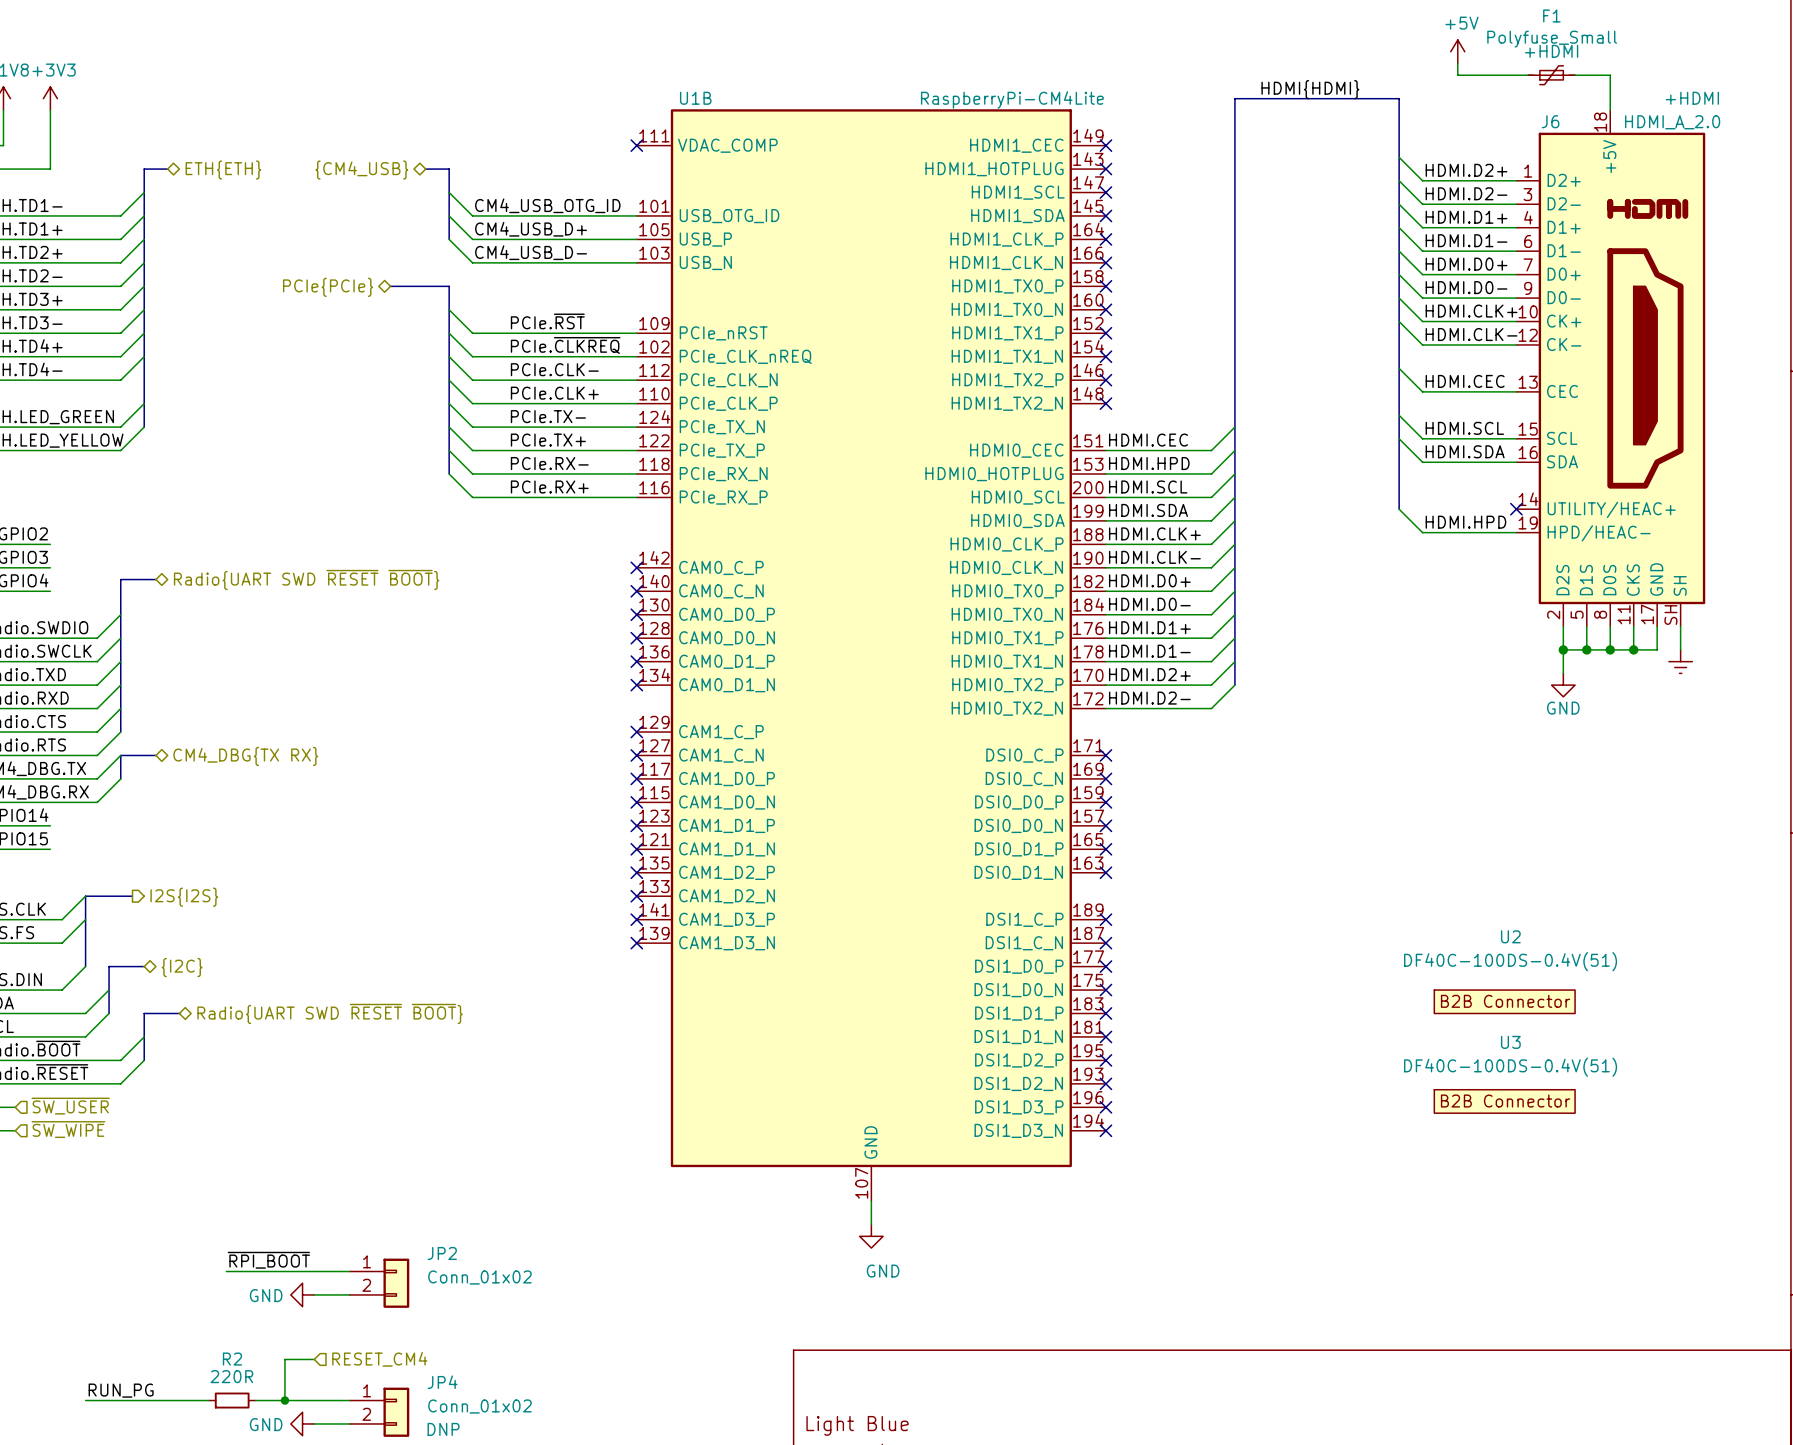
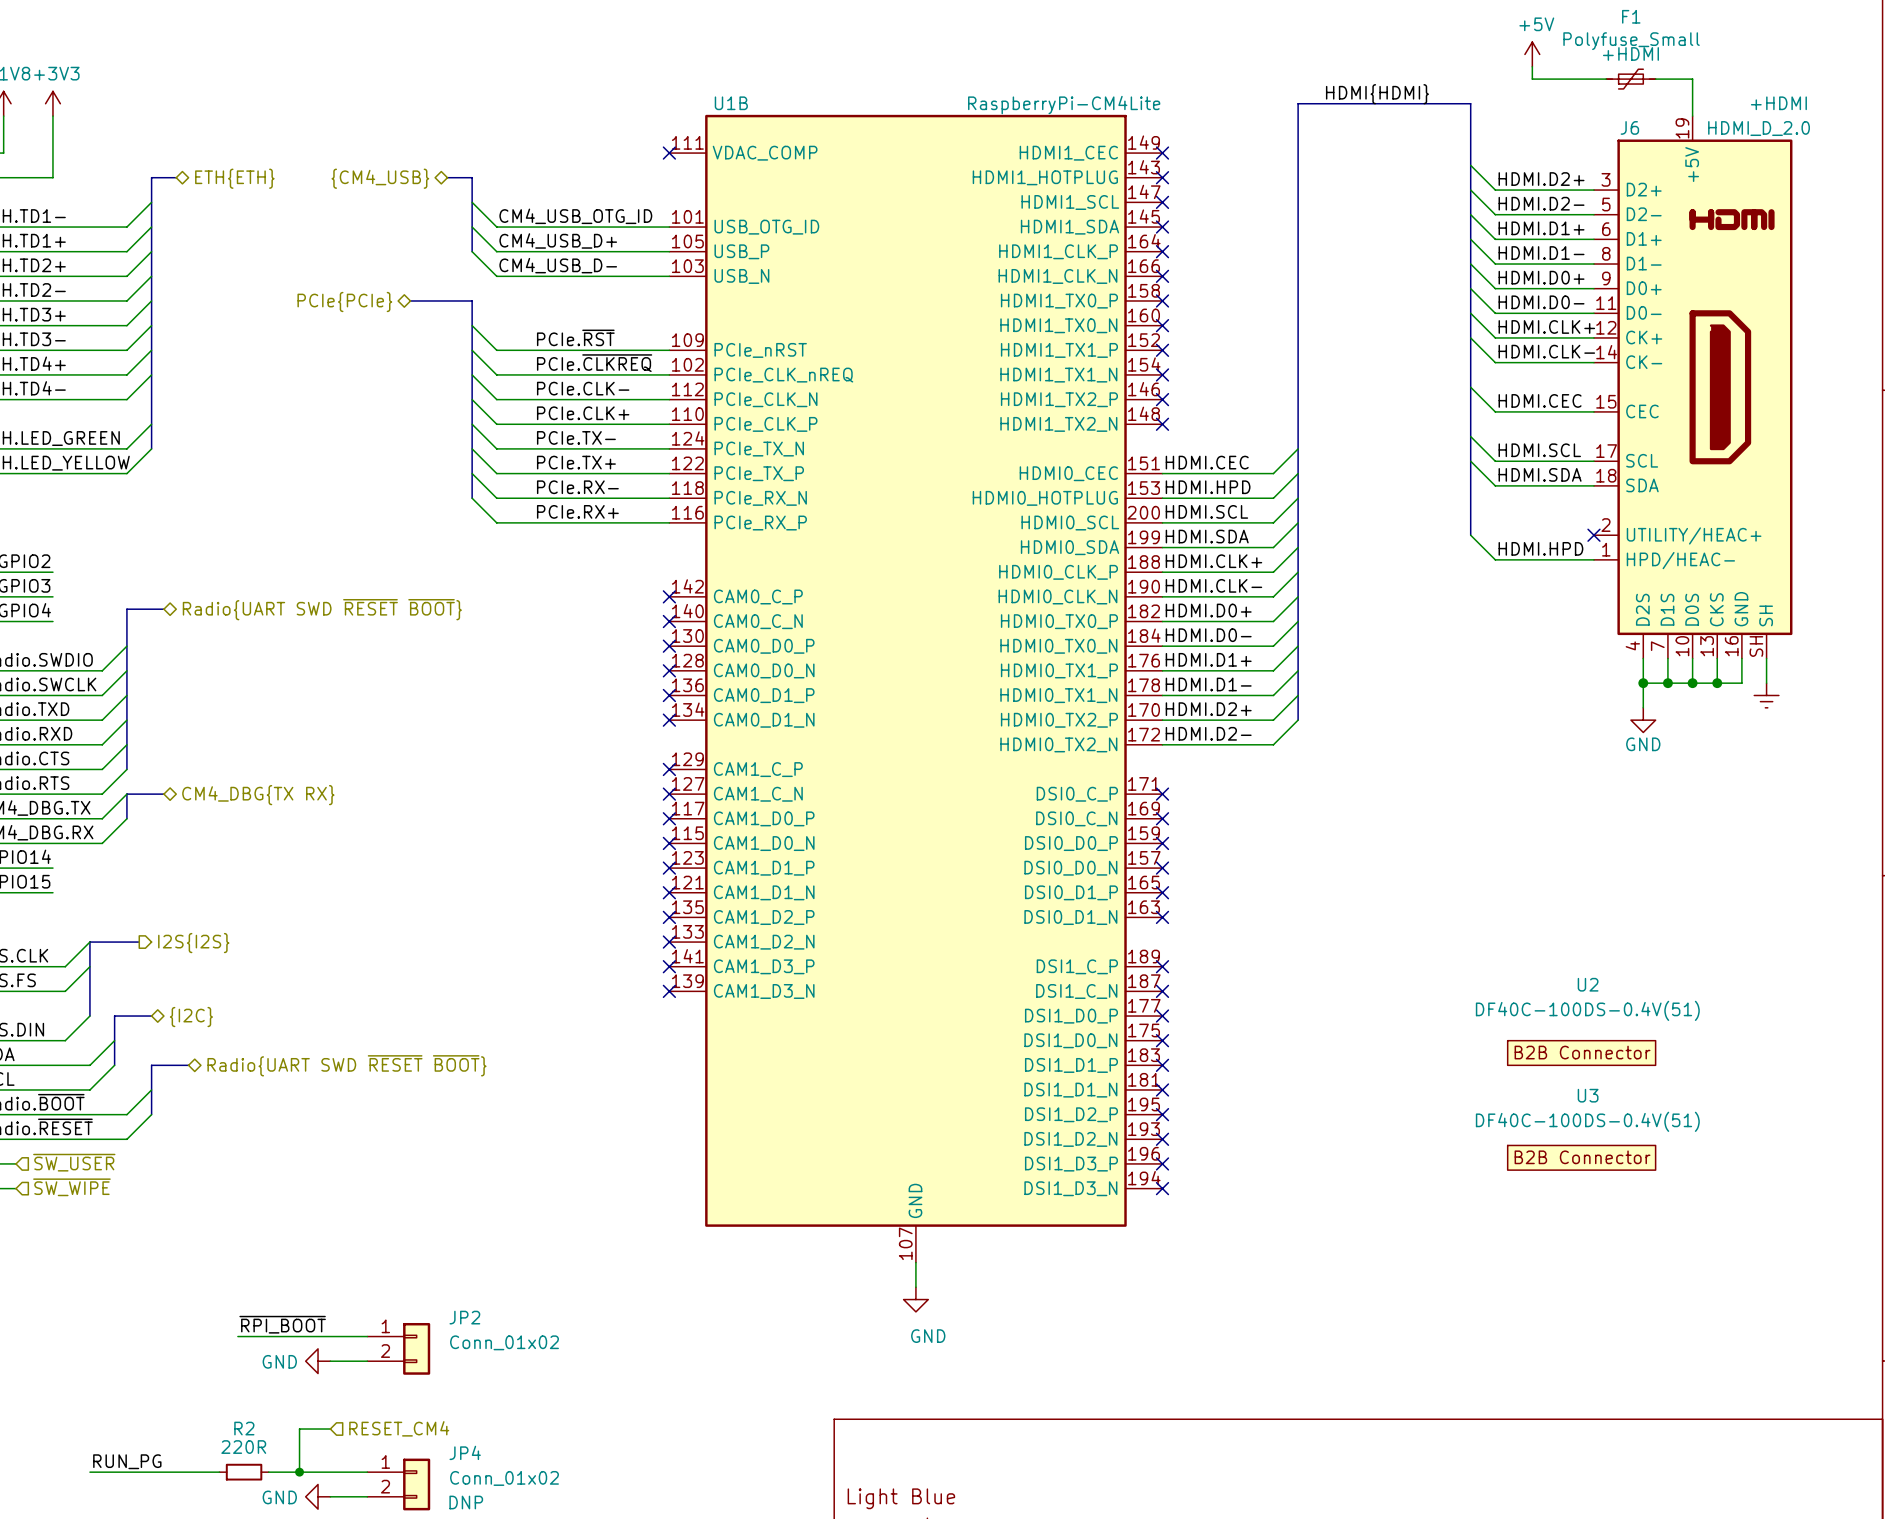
J6 symbol: [1516, 110, 1706, 627] -> [1593, 116, 1793, 659]
J6 value: HDMI_A_2.0 (1672, 122) -> HDMI_D_2.0 (1759, 128)

